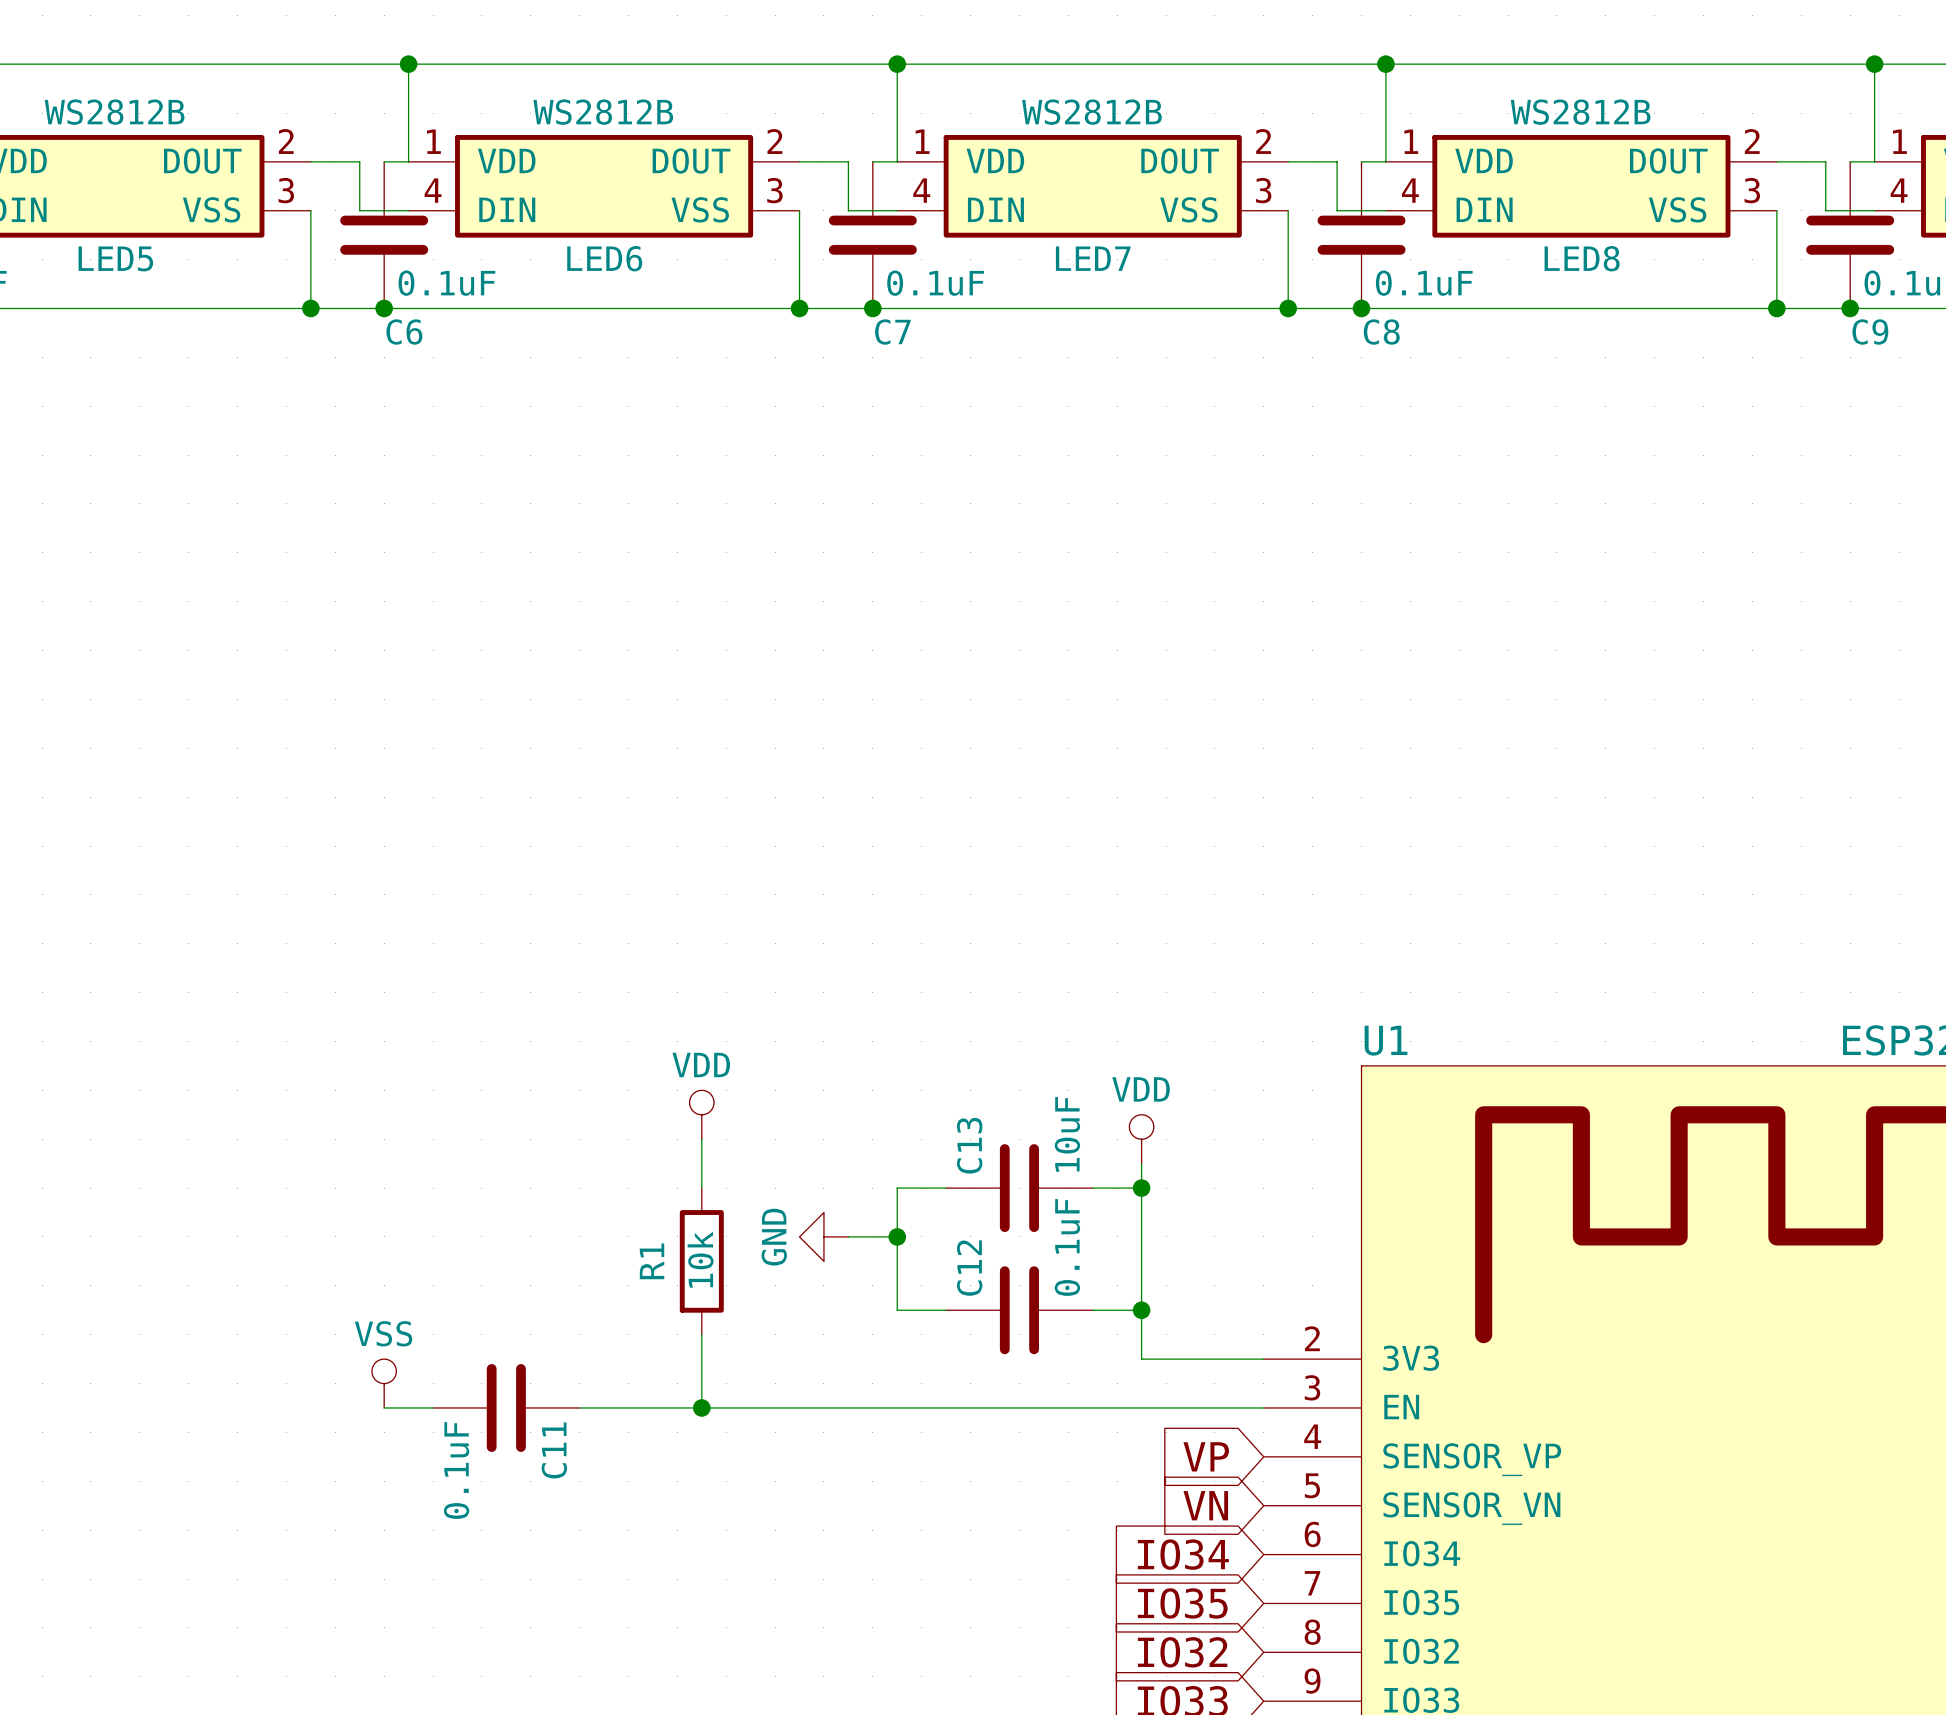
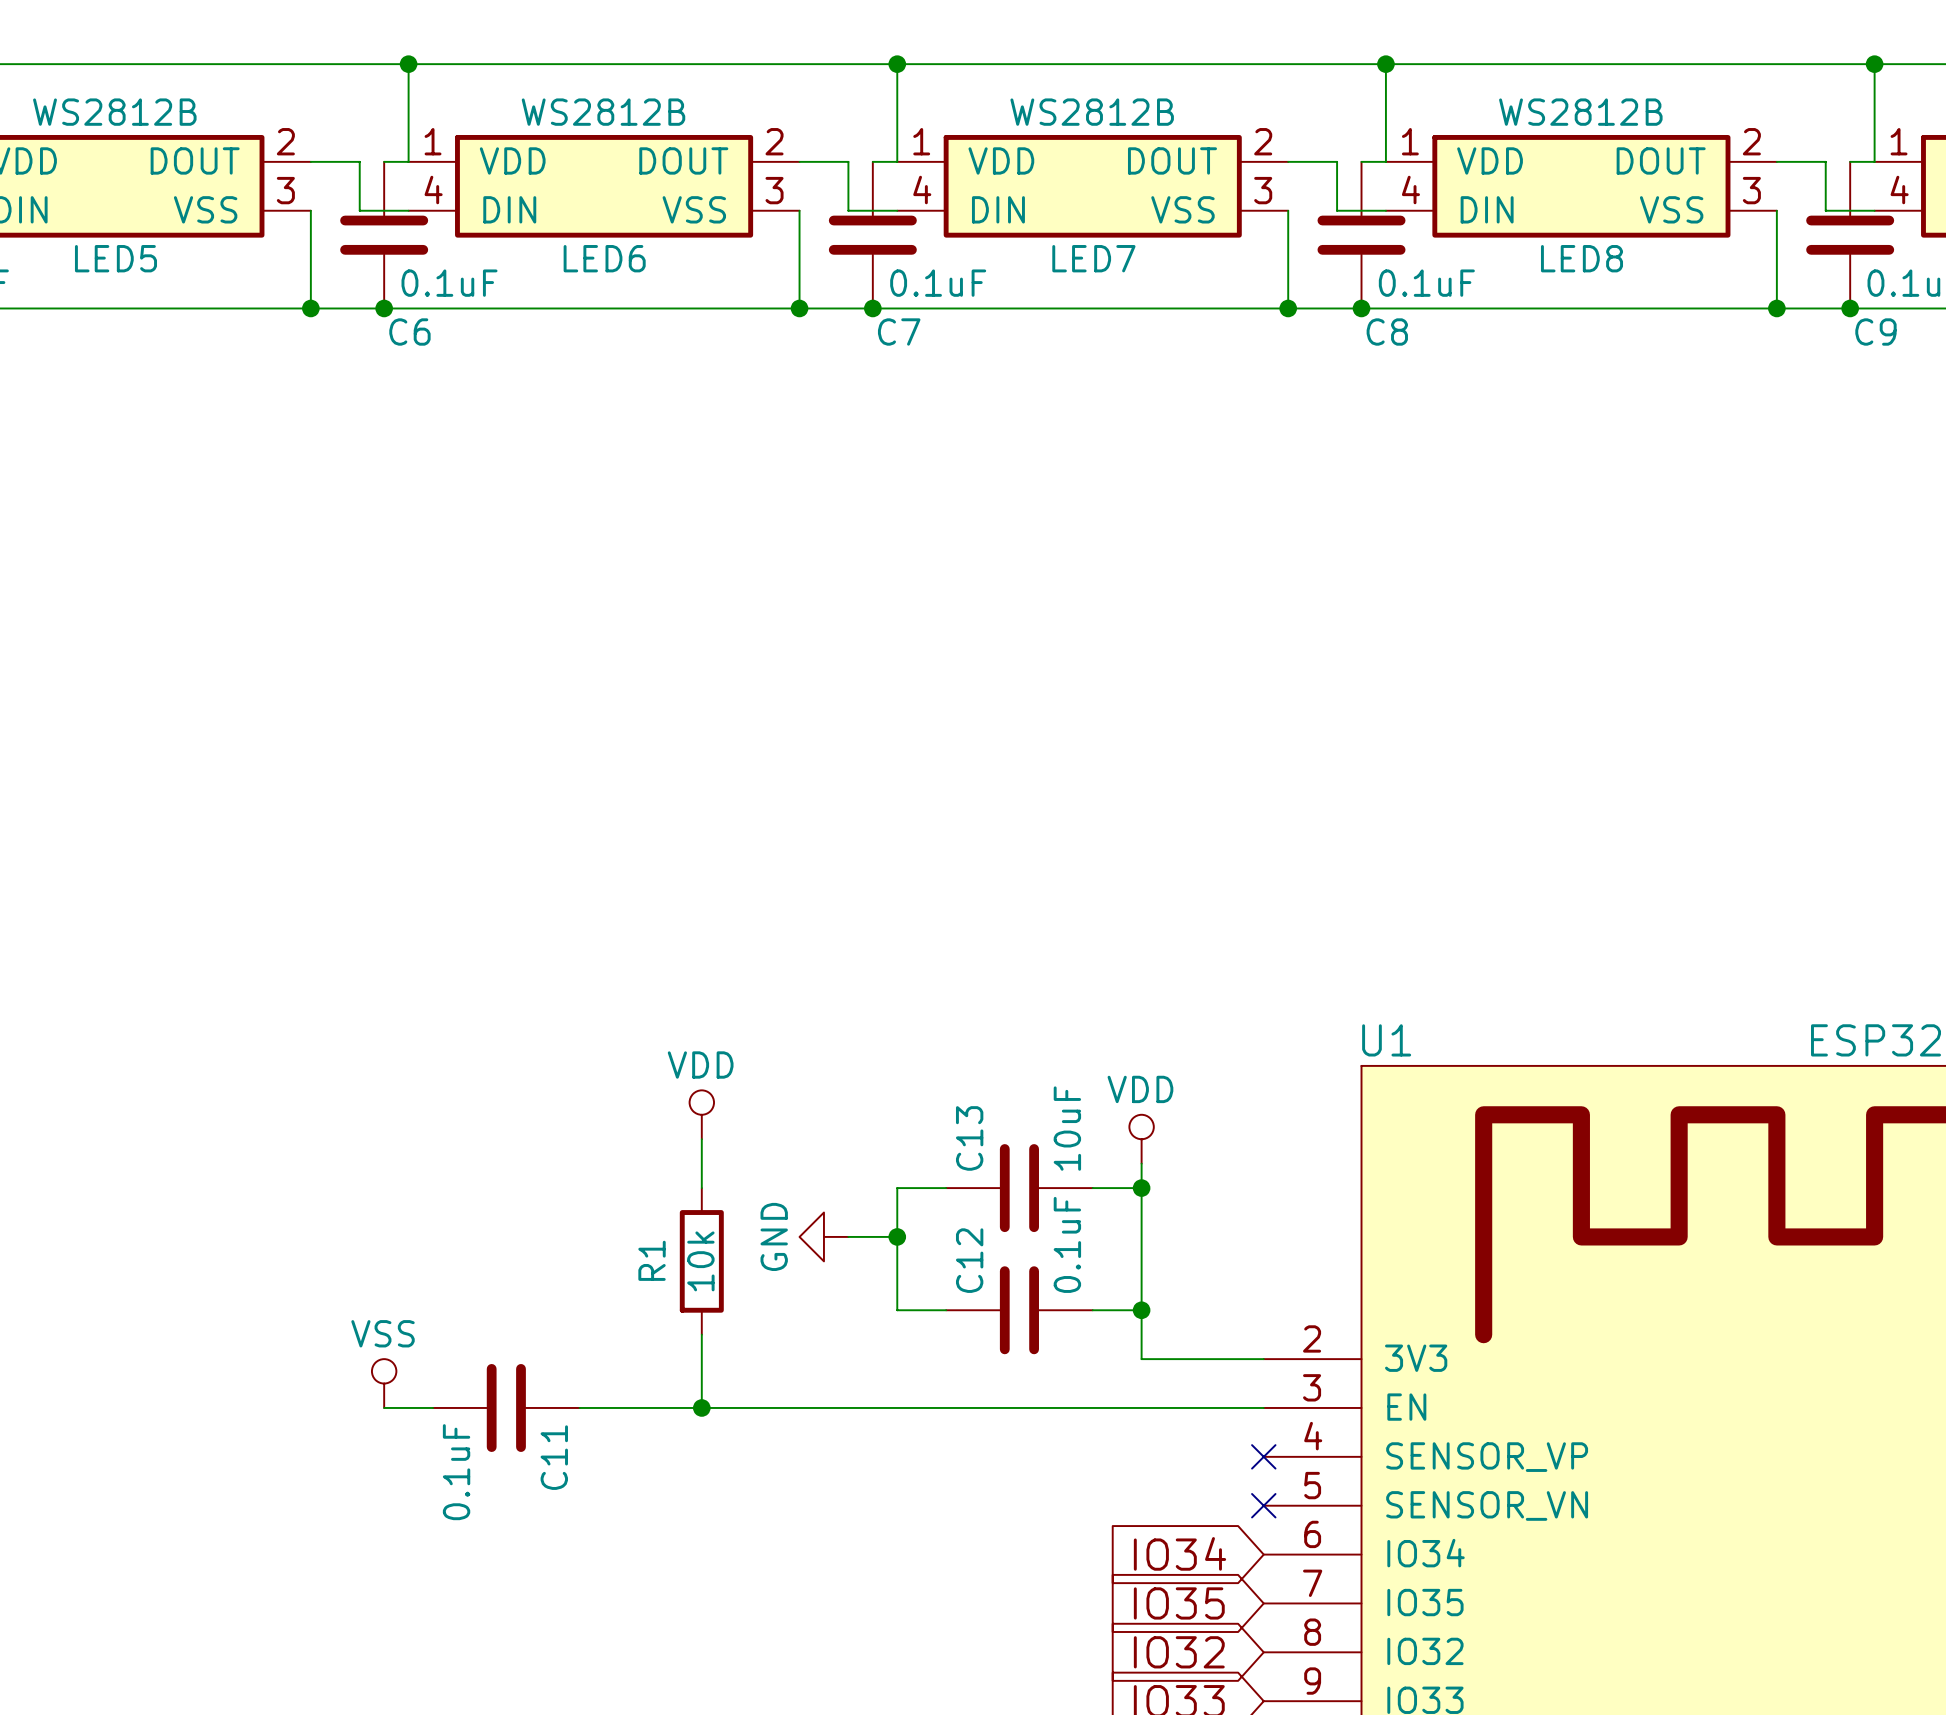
global label: VP (1206, 1456) -> none
no-connect mark: none -> (1263, 1456)
global label: VN (1205, 1505) -> none
no-connect mark: none -> (1263, 1505)

